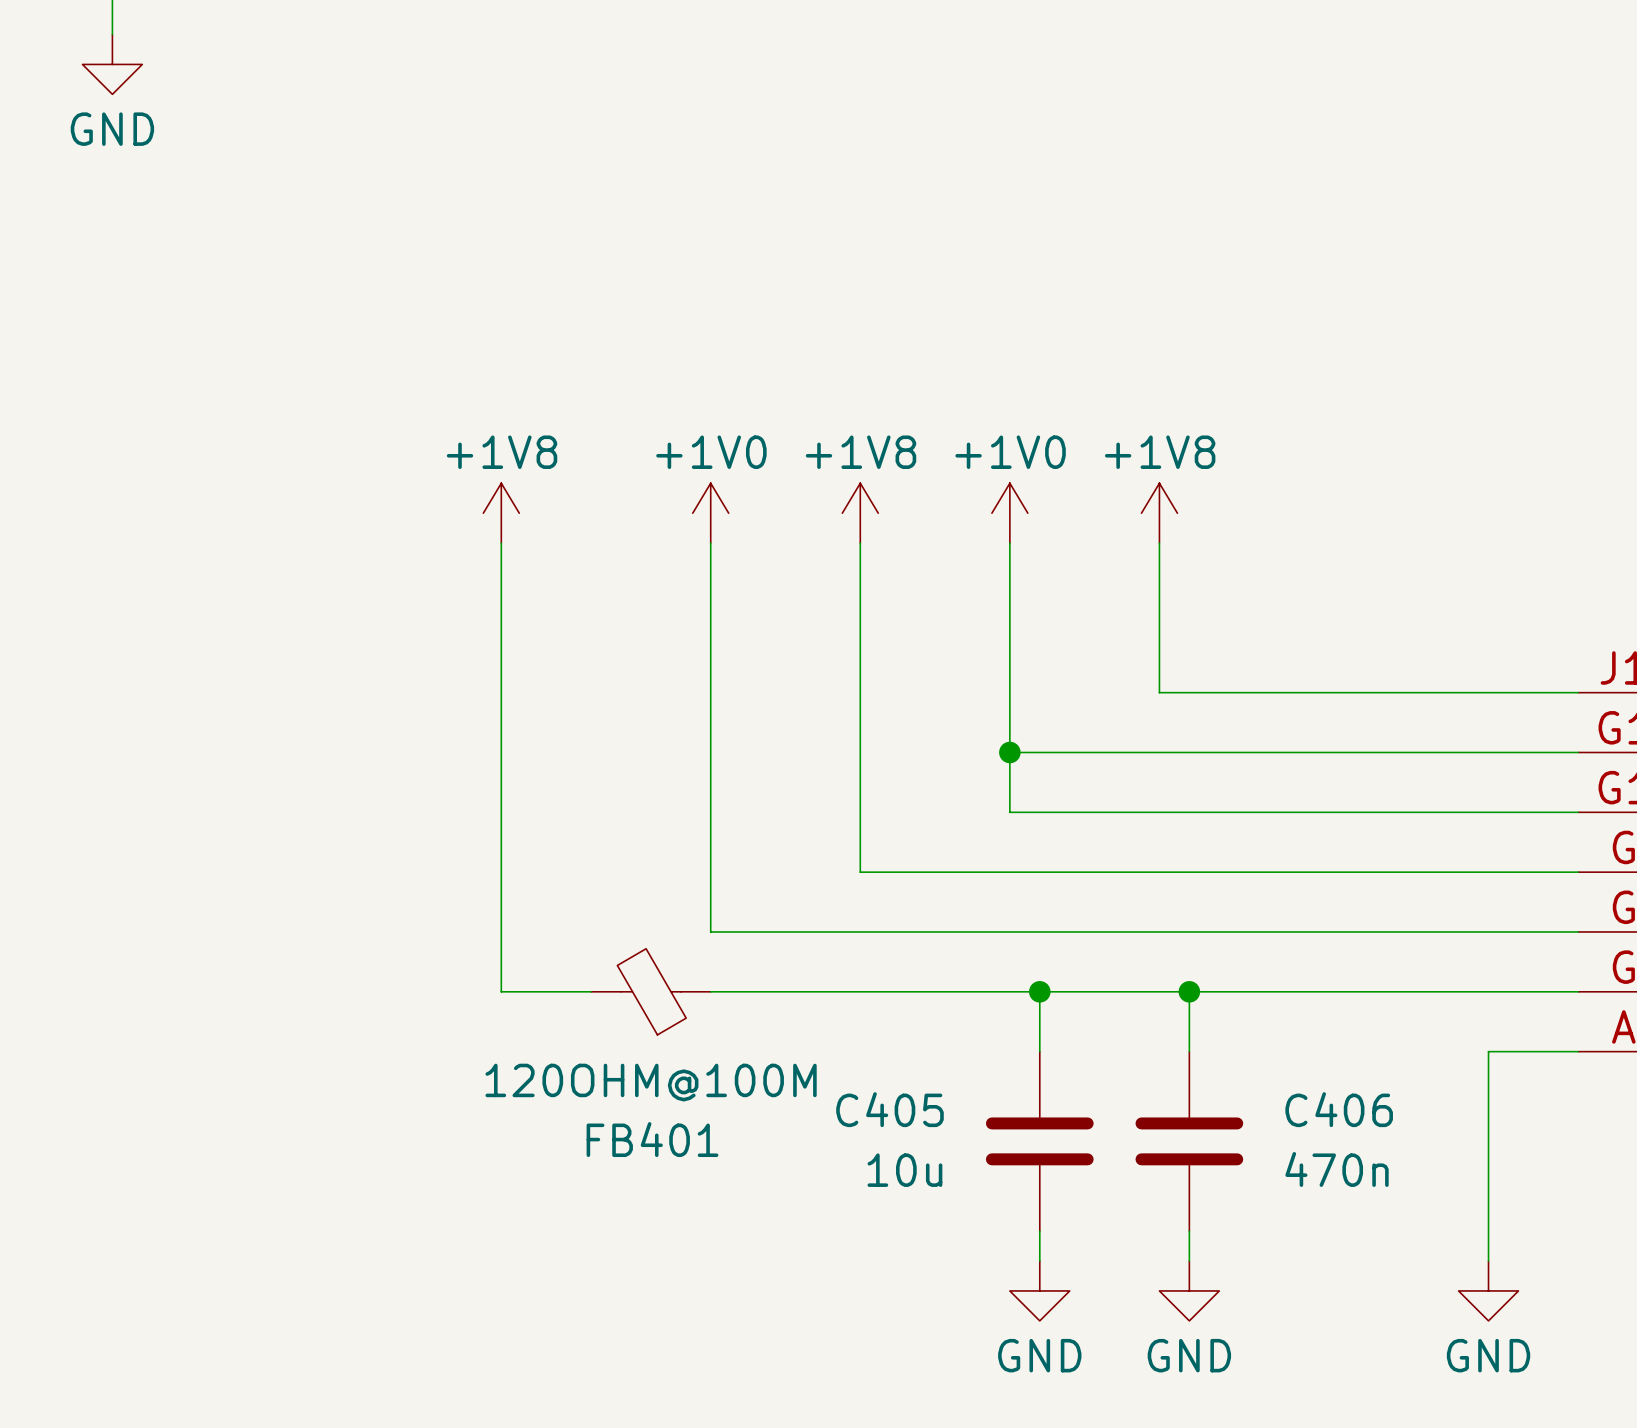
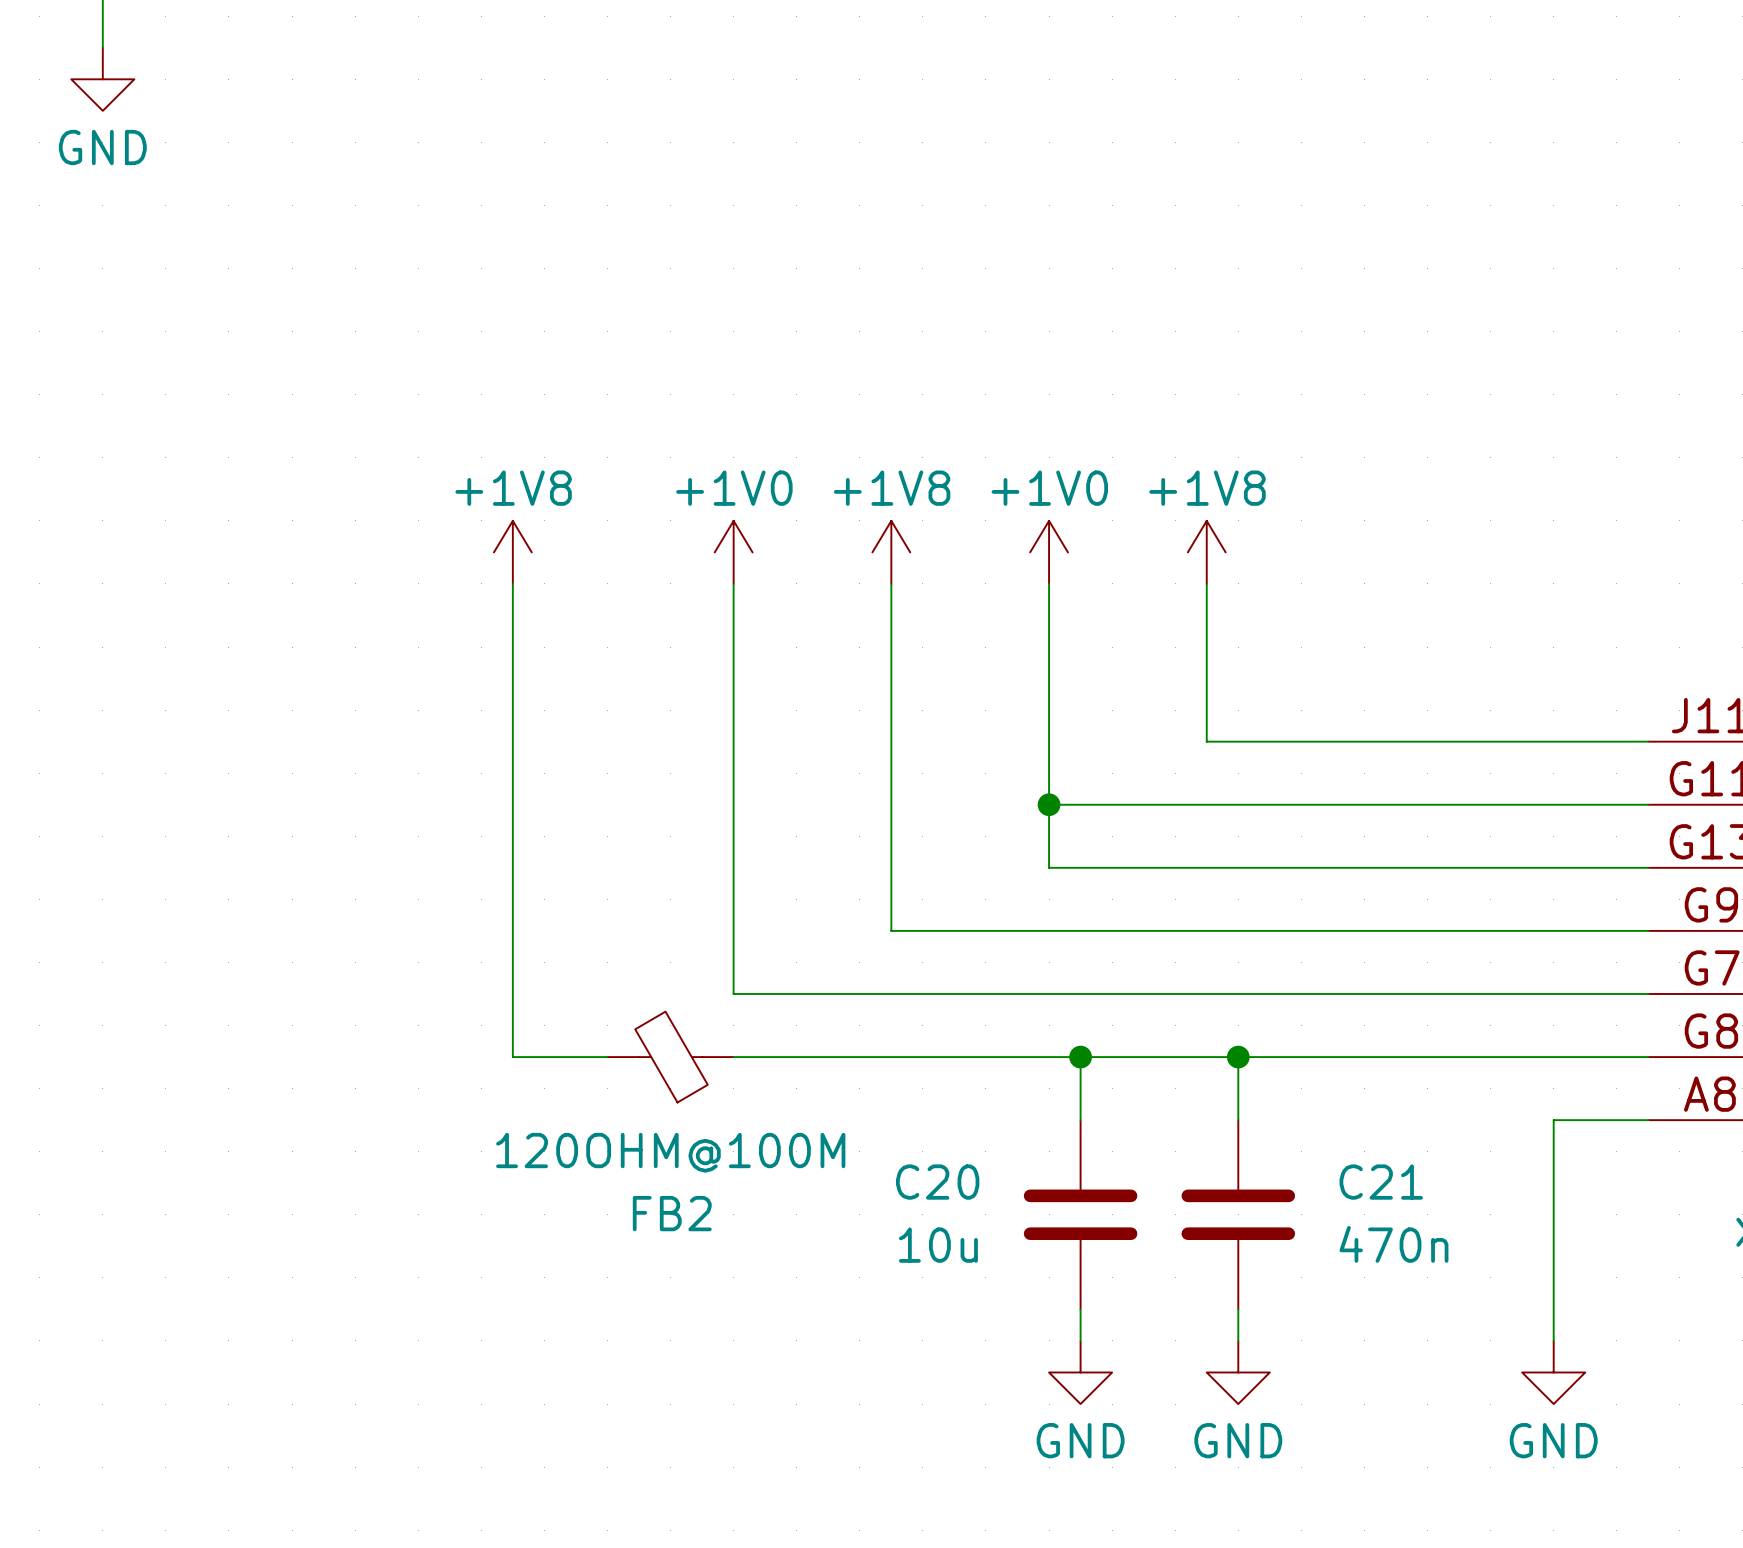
C405 name: C405 (889, 1109) -> C20 (937, 1182)
C406 name: C406 (1339, 1109) -> C21 (1381, 1182)
FB401 name: FB401 (652, 1139) -> FB2 (672, 1213)

